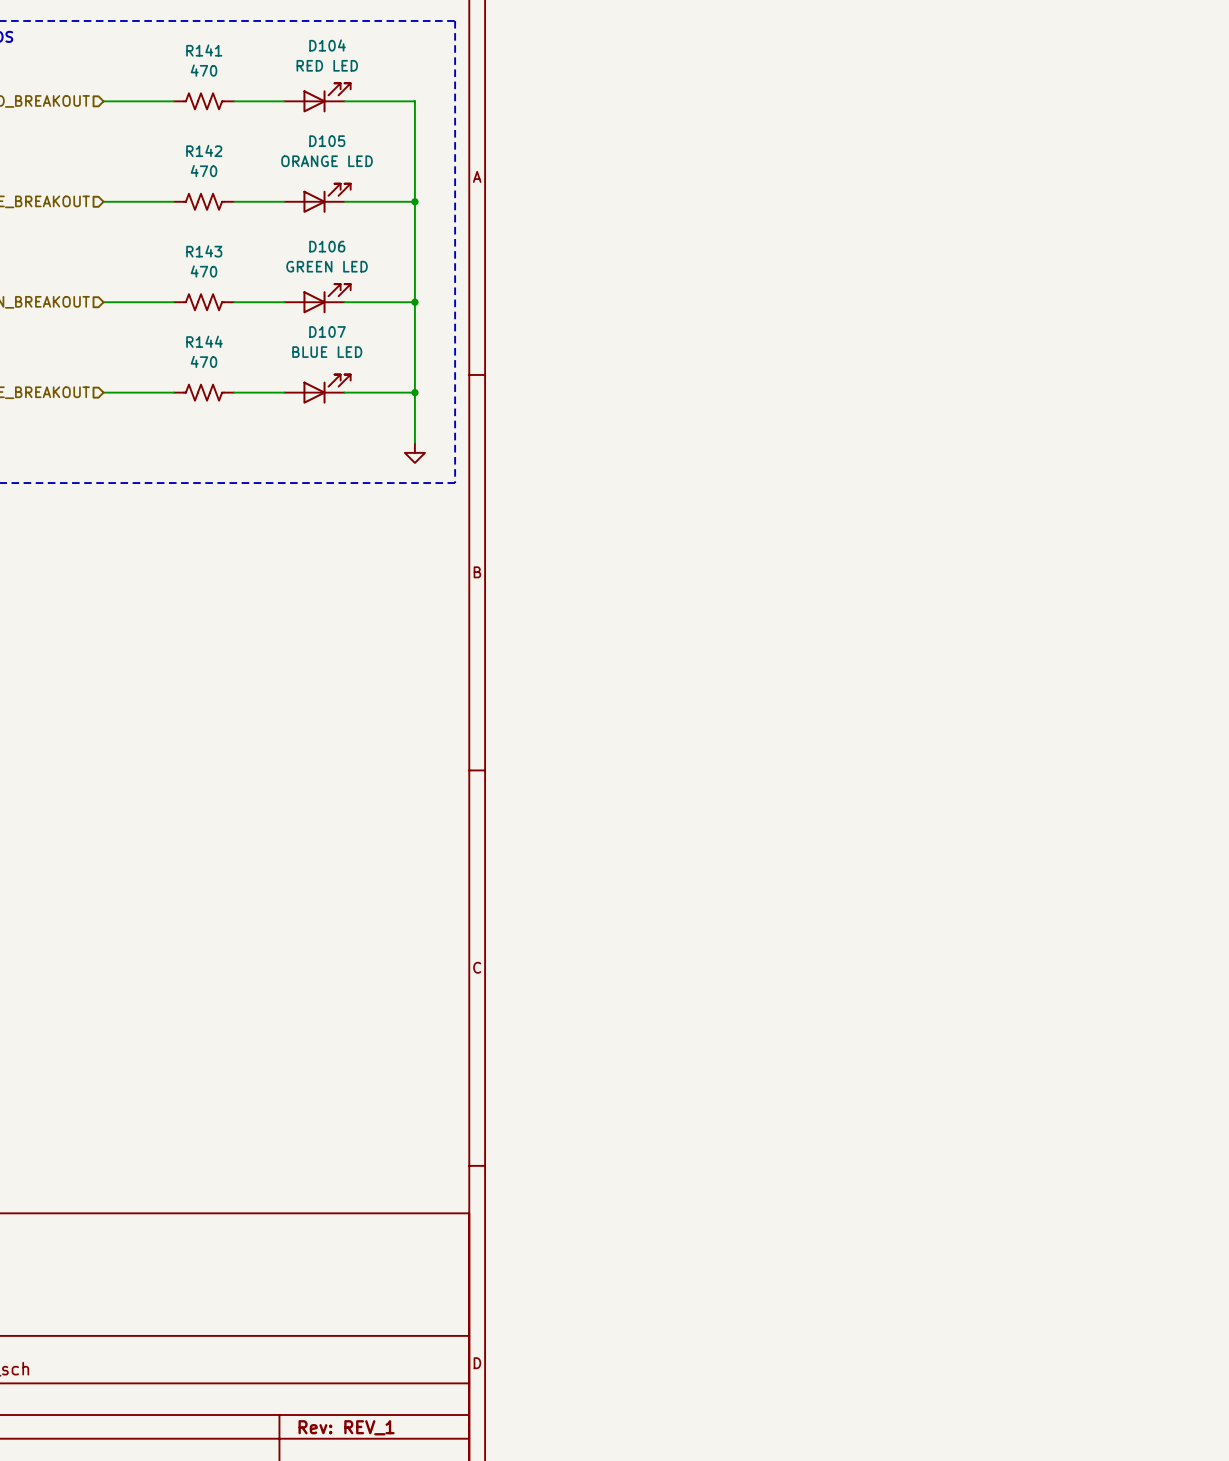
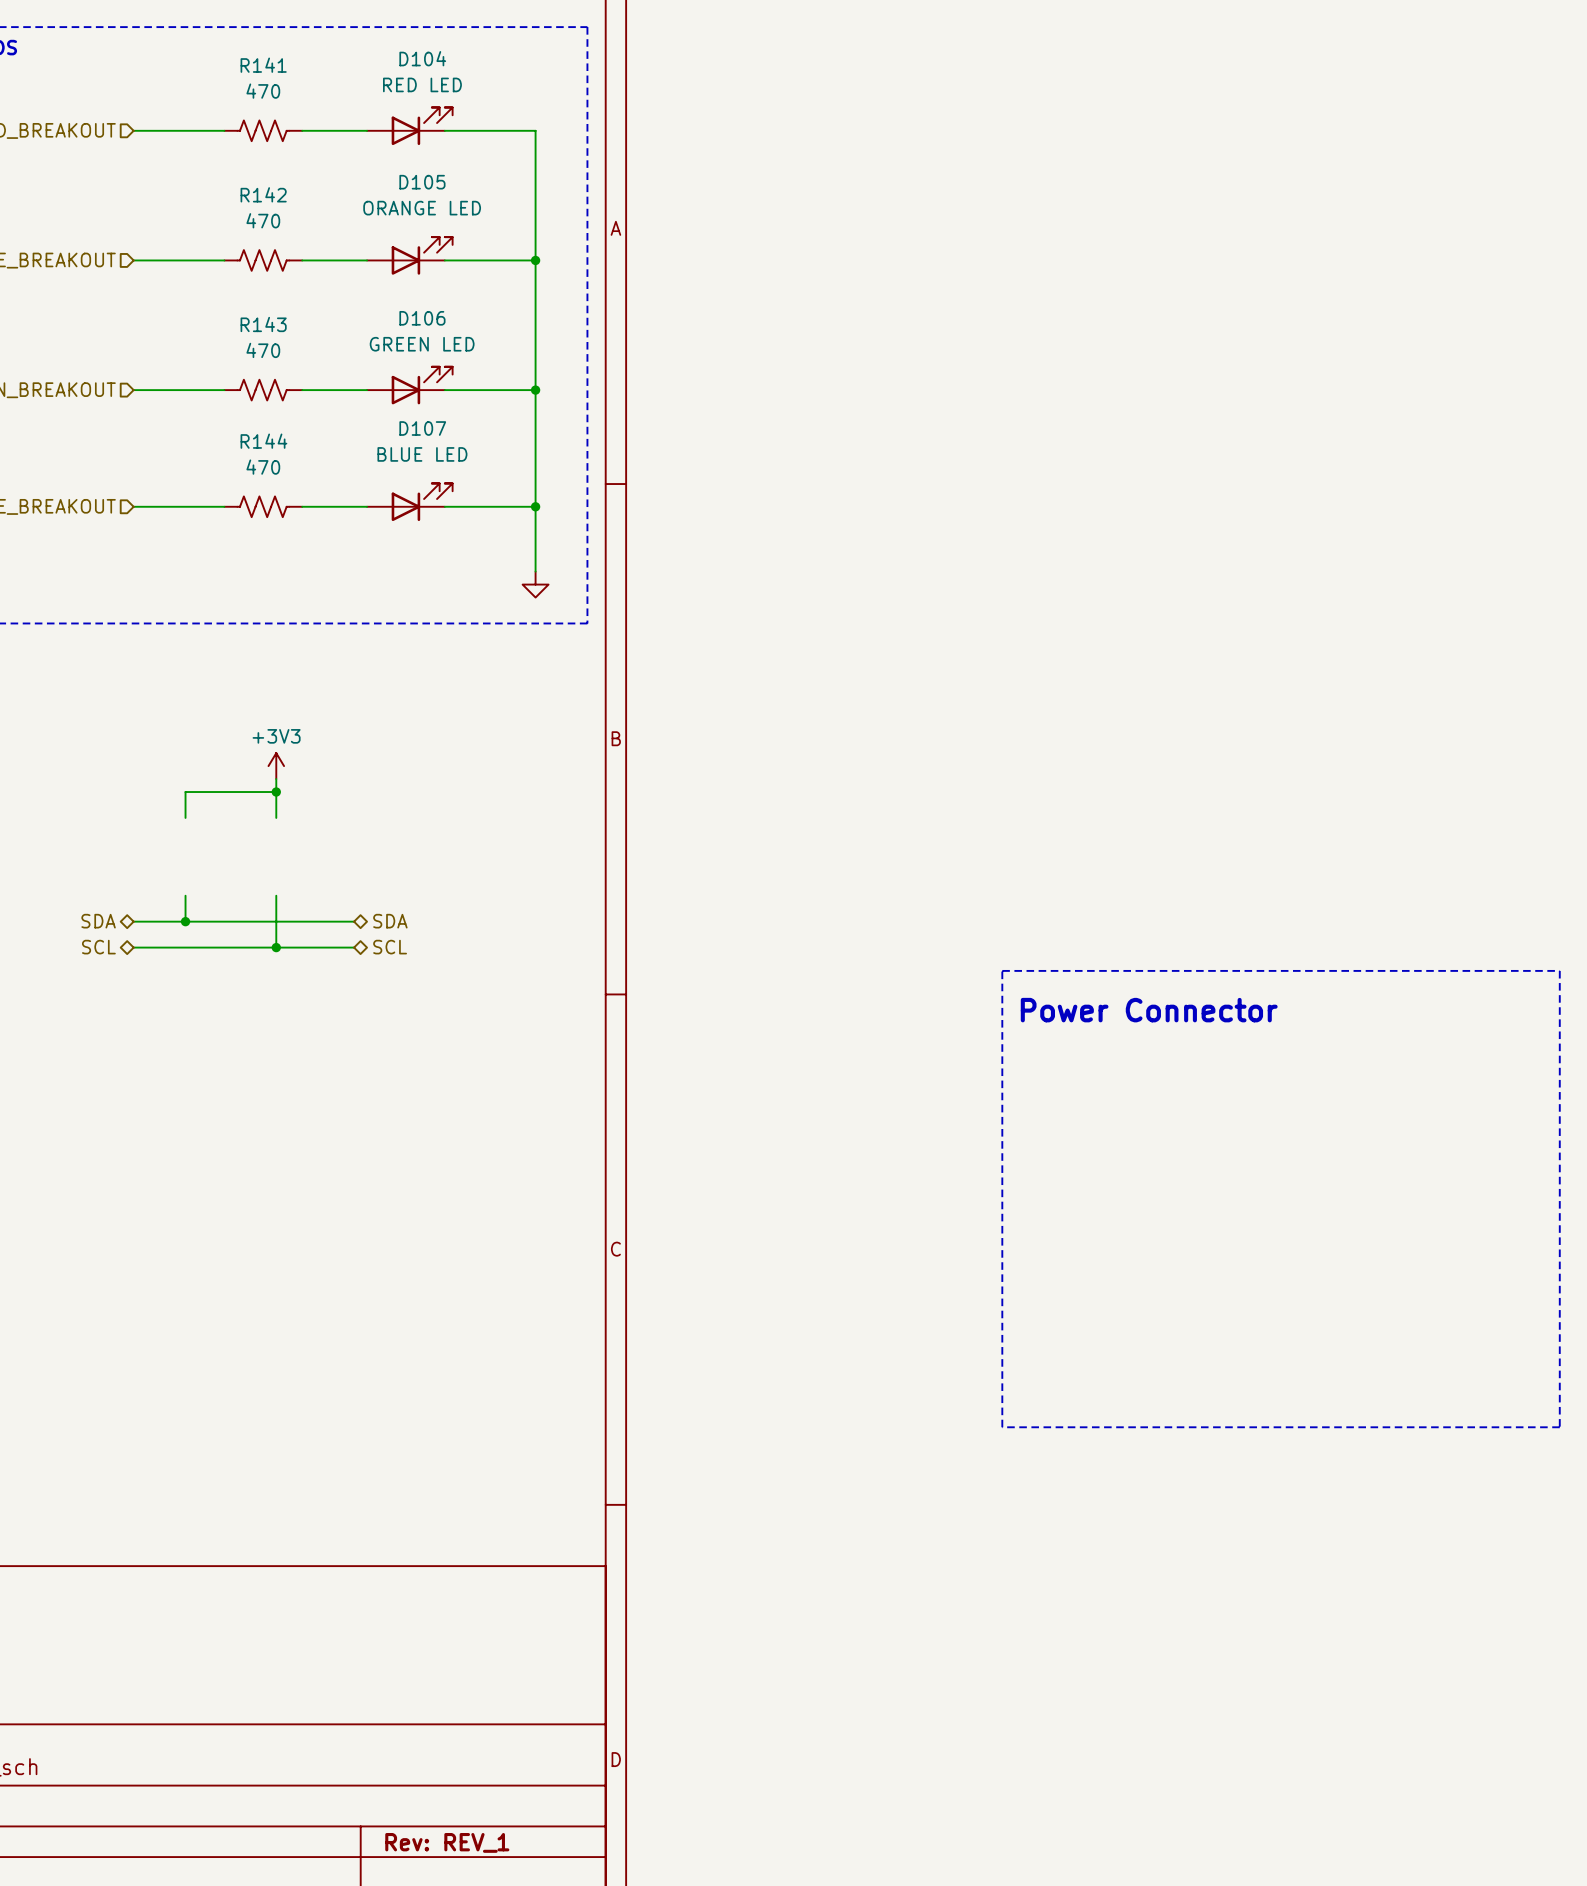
power symbol: none -> +3V3 (276, 766)
wire: none -> (276, 779) (276, 817)
wire: none -> (276, 792) (185, 792) (185, 817)
junction: none -> (276, 792)
wire: none -> (185, 895) (185, 921)
wire: none -> (276, 895) (276, 947)
hierarchical label: none -> SDA (98, 921)
hierarchical label: none -> SDA (390, 921)
wire: none -> (133, 921) (354, 921)
junction: none -> (185, 921)
hierarchical label: none -> SCL (98, 947)
hierarchical label: none -> SCL (390, 947)
wire: none -> (133, 947) (354, 947)
junction: none -> (276, 947)
line: none -> (1002, 970) (1559, 970) (1559, 1427) (1002, 1427) (1002, 970)
text: none -> Power Connector (1149, 1010)

